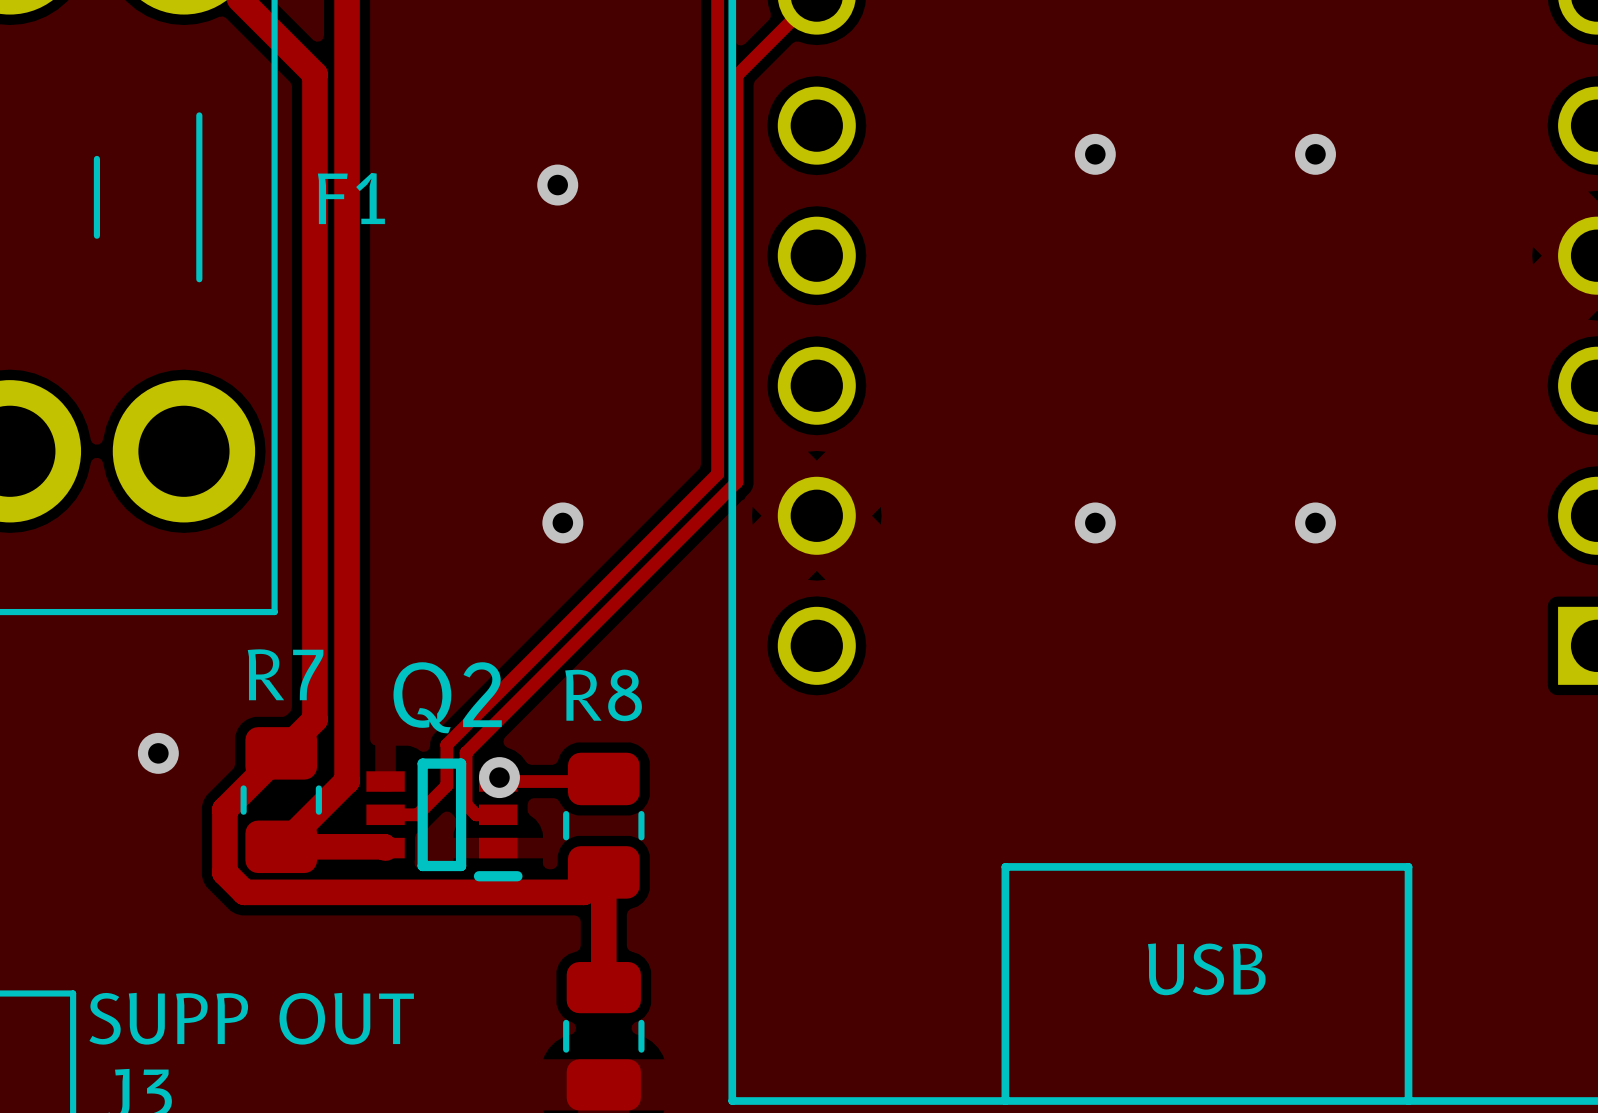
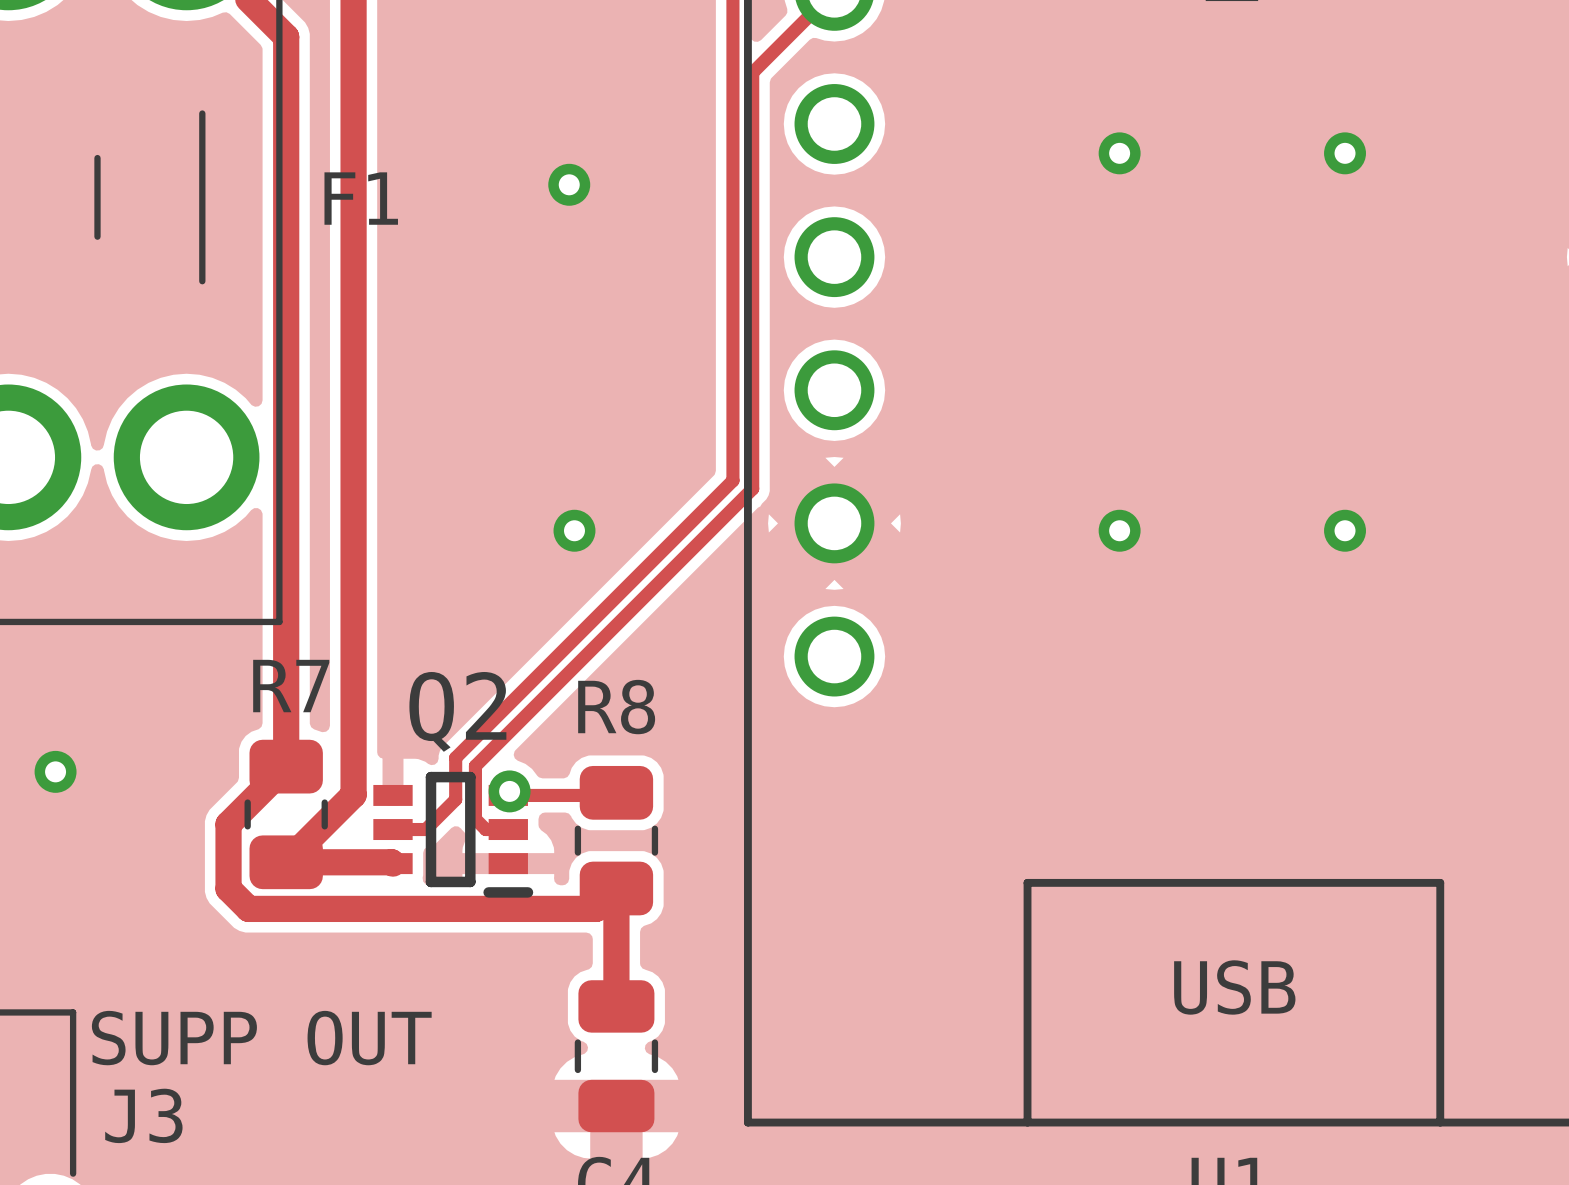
track: (281, 40) (314, 74) (314, 719) (281, 753) -> (286, 36) (286, 766)
via position: (158, 753) -> (55, 771)

